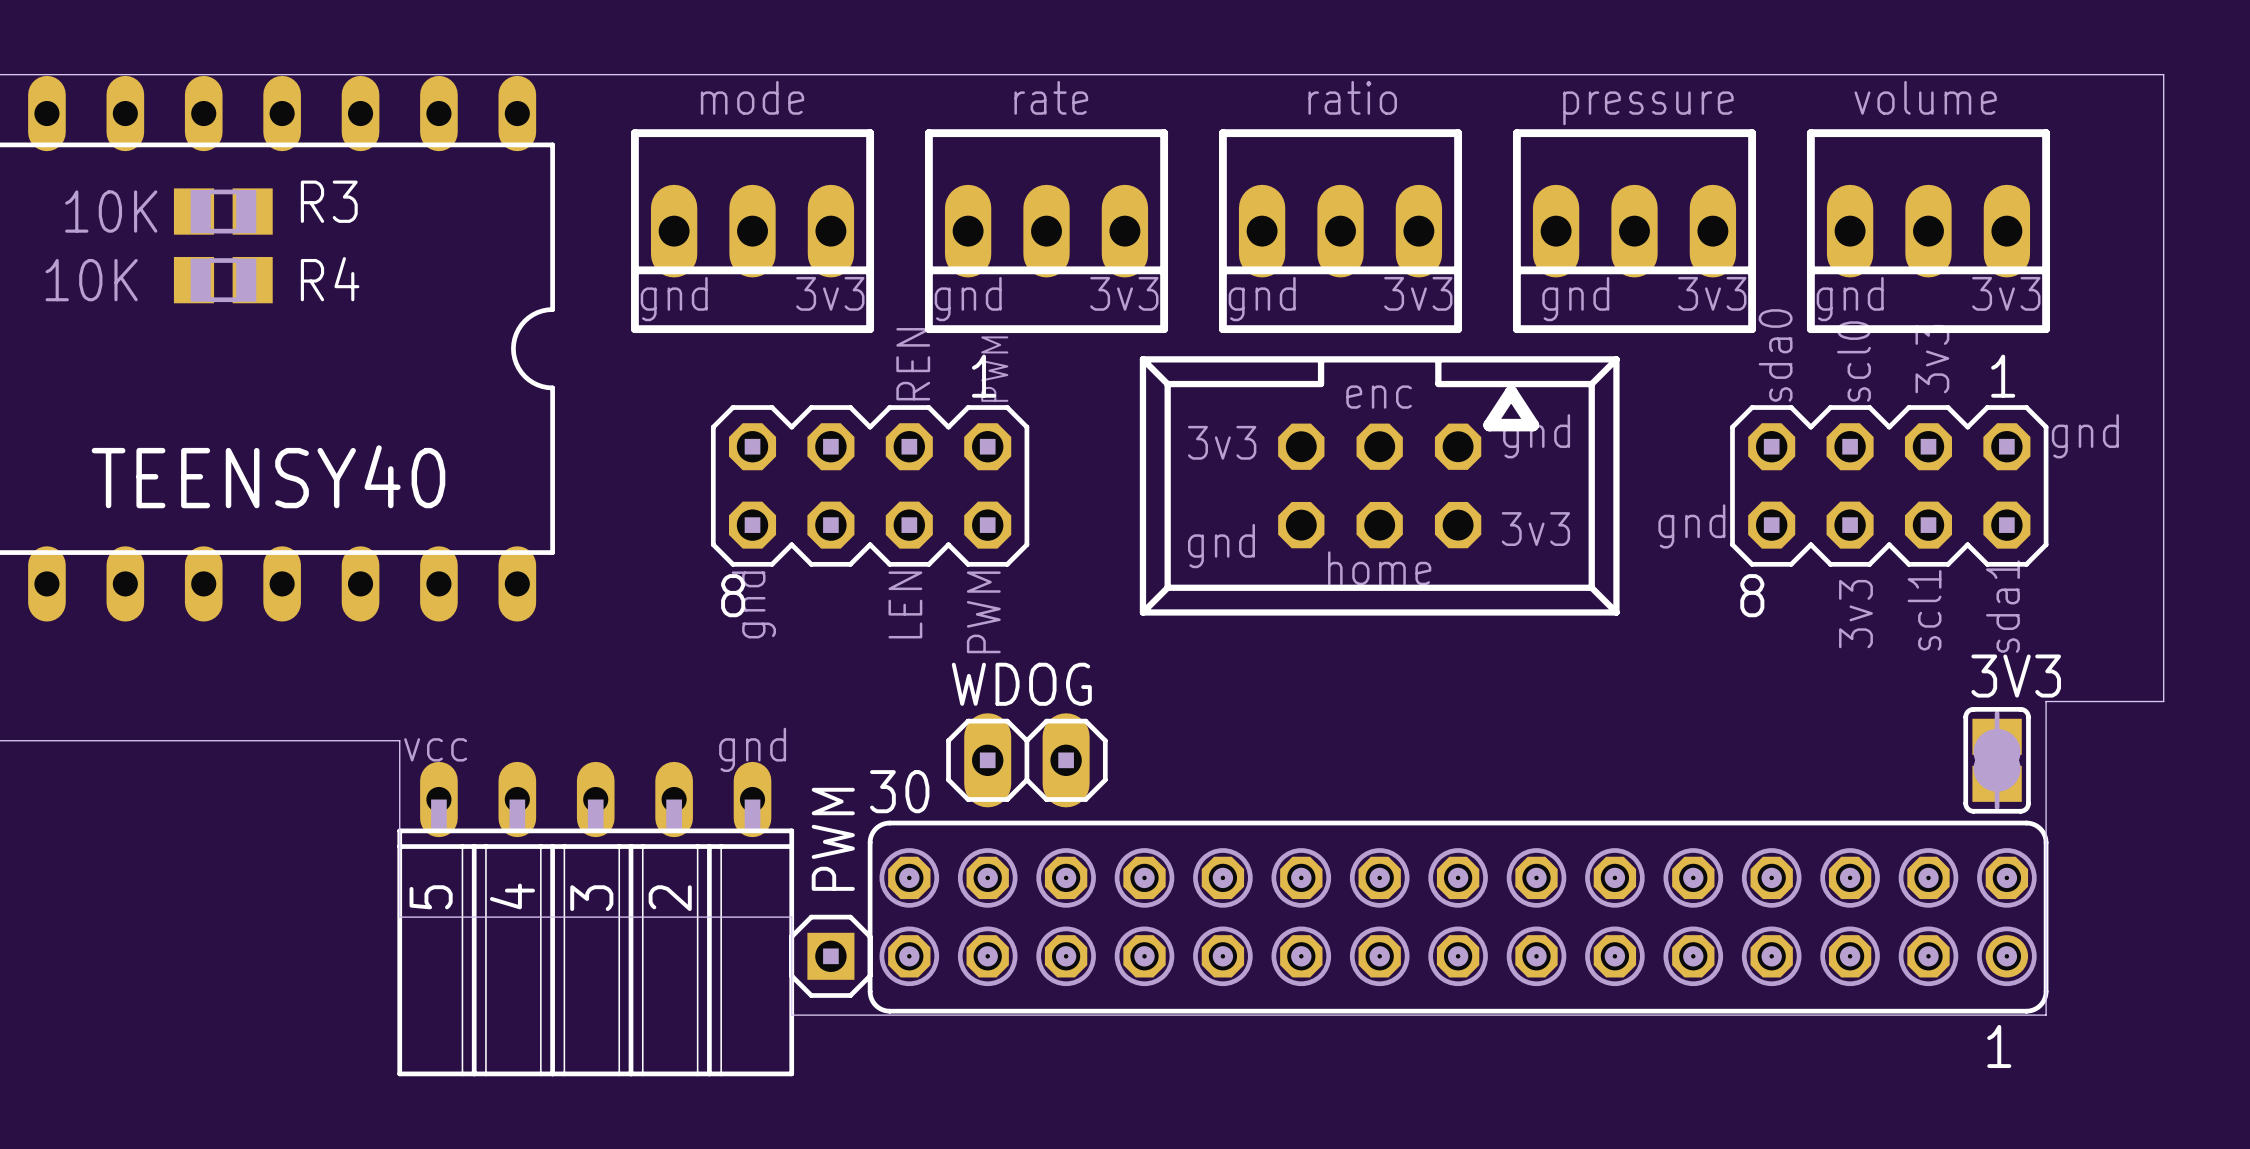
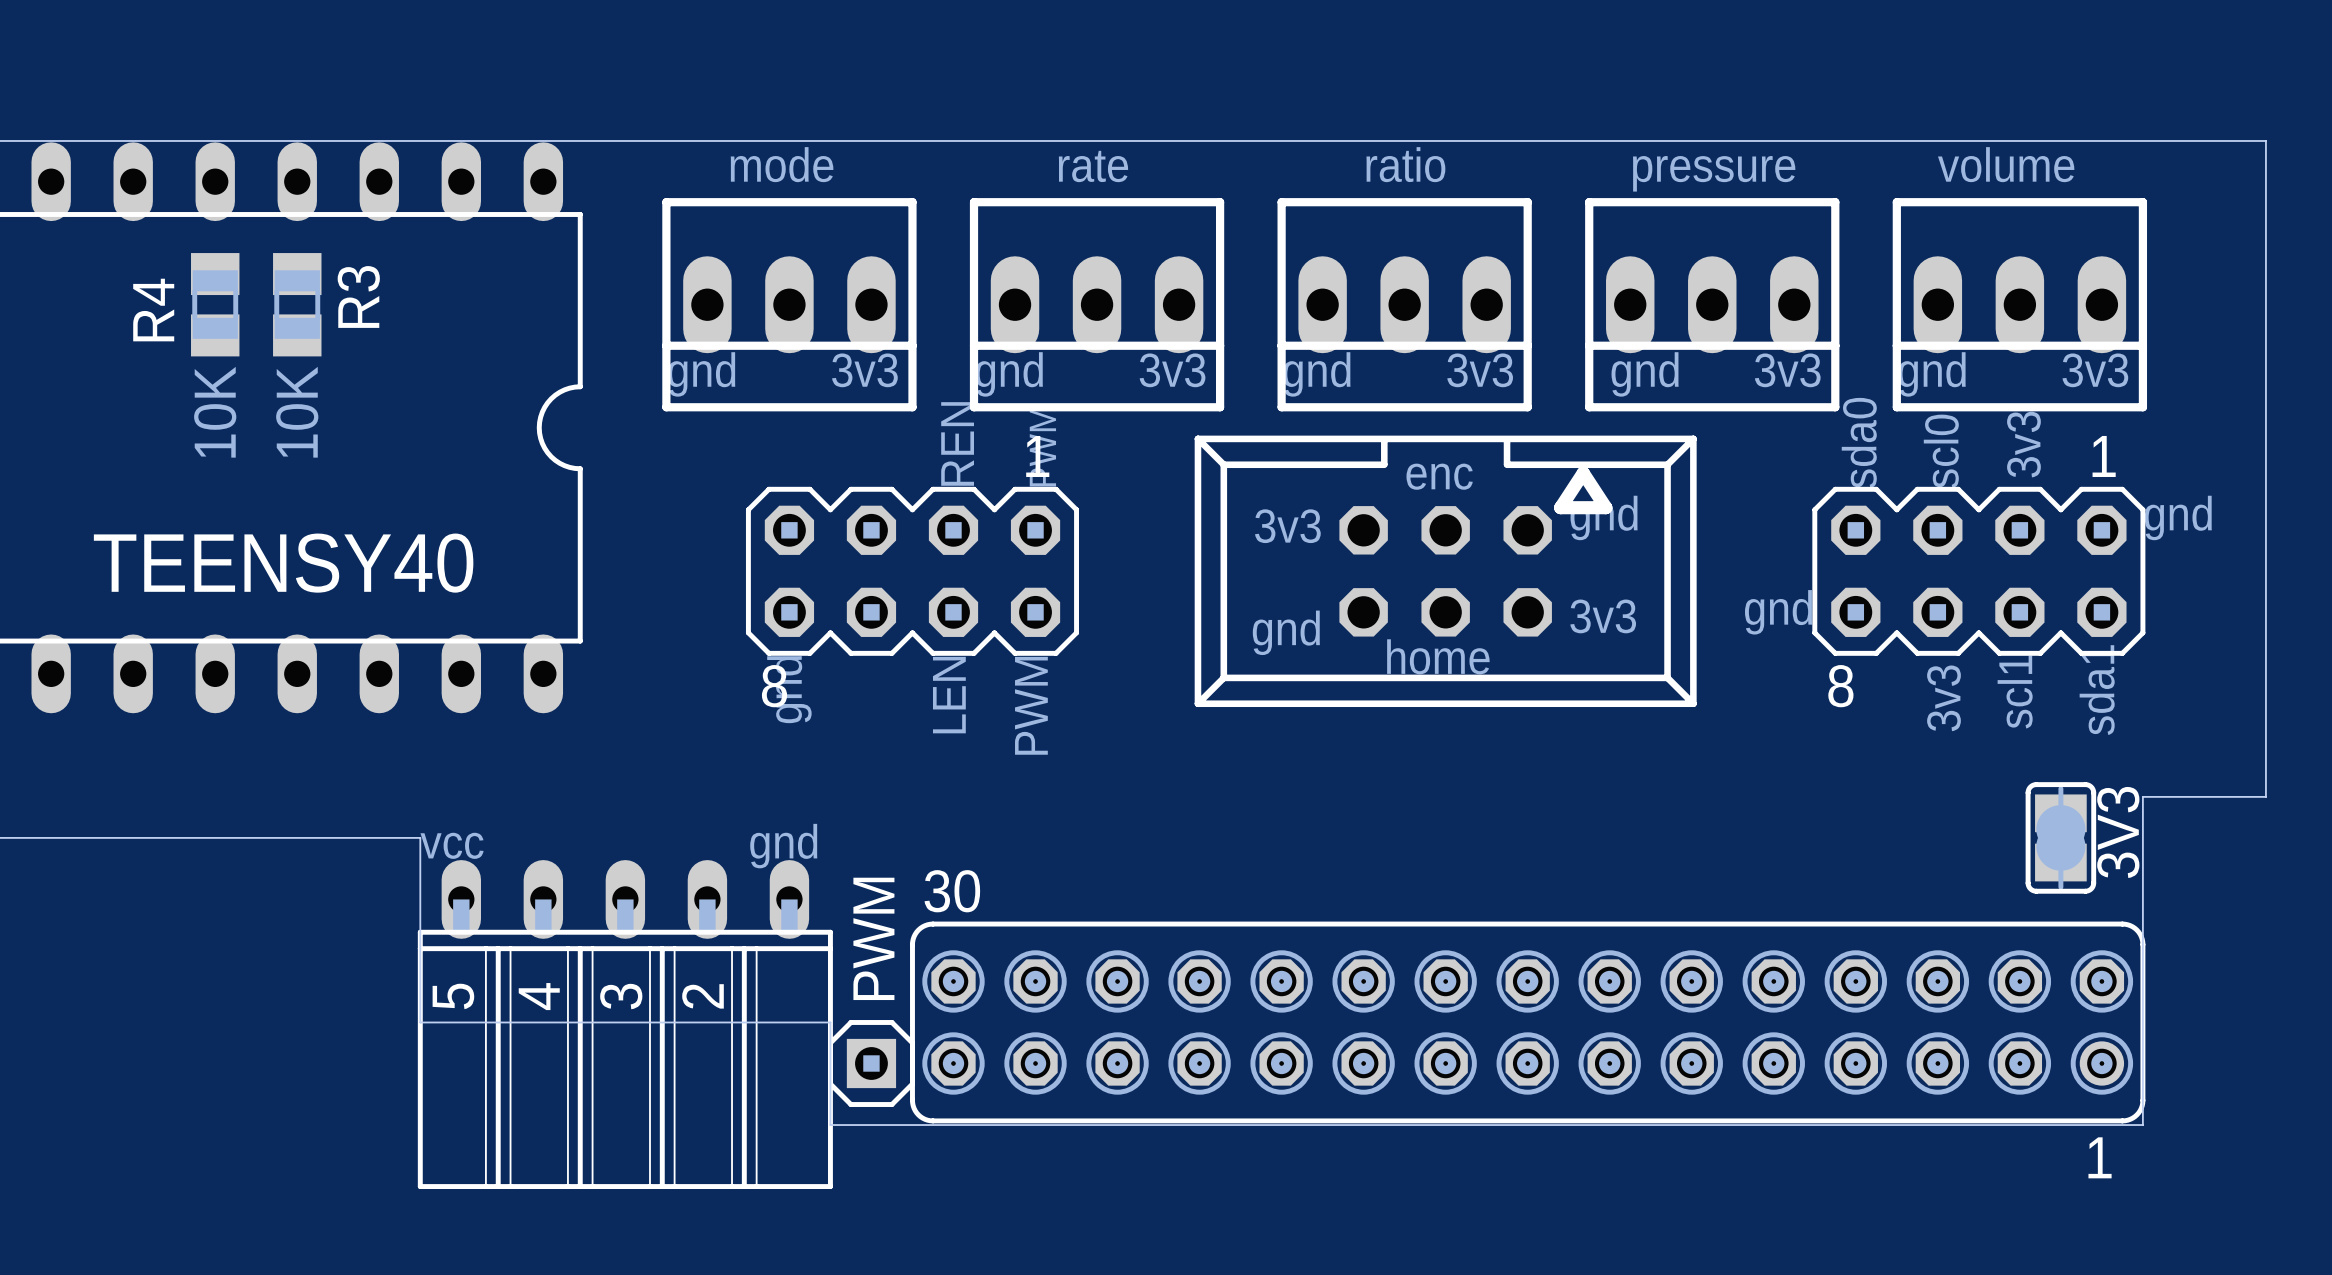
R3 value position: 10K (111, 211) -> 10K (297, 412)
R3 rotation: 0° (223, 211) -> 90° clockwise (297, 304)
R3 position: (223, 211) -> (297, 304)
R4 name position: R4 (330, 279) -> R4 (153, 310)
R4 value position: 10K (91, 280) -> 10K (215, 412)
R4 rotation: 0° (223, 280) -> 90° clockwise (215, 304)
3V3 name rotation: 0° (2016, 676) -> 90° counterclockwise (2118, 832)
WDOG: (1026, 760) -> none
3V3 position: (1997, 760) -> (2060, 837)

